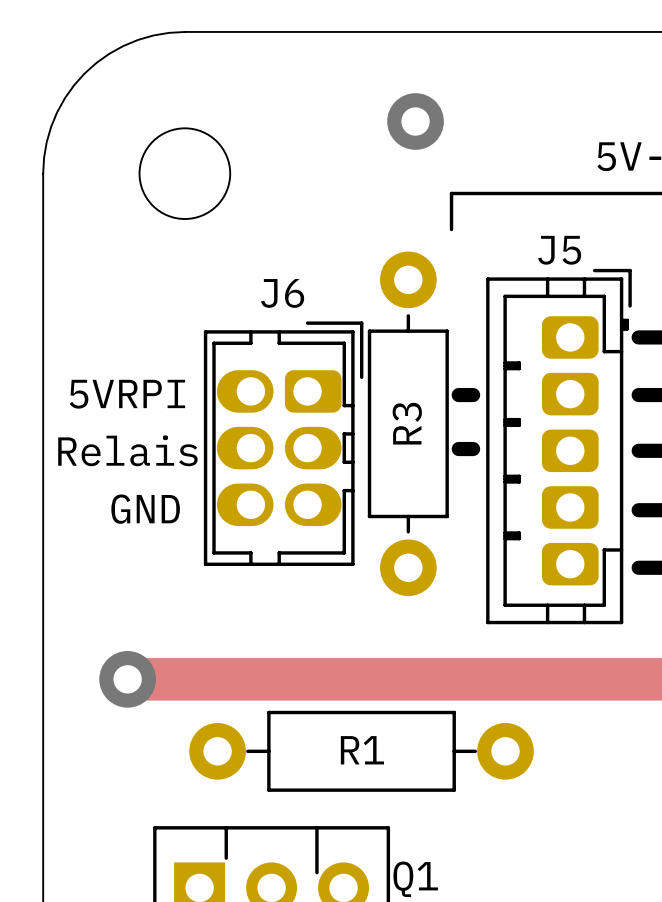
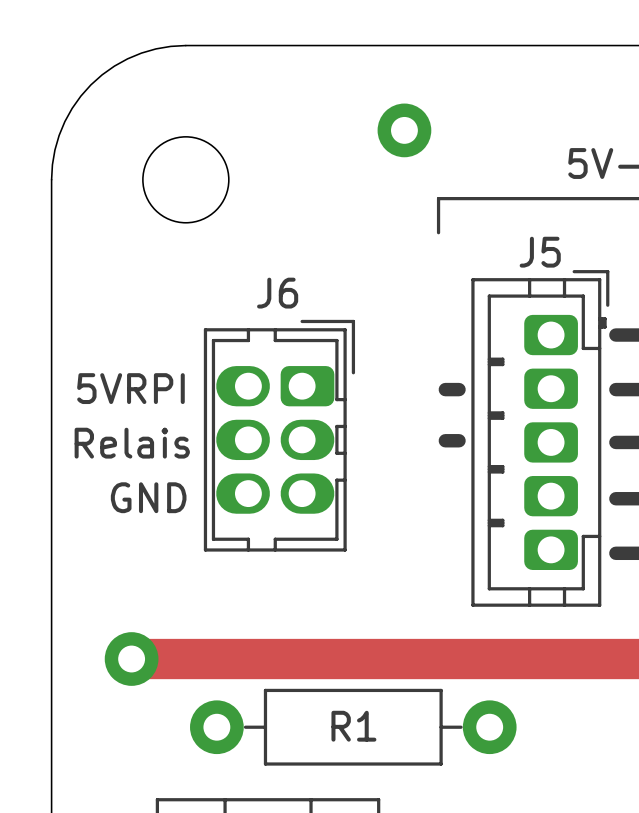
R3: (408, 423) -> none

